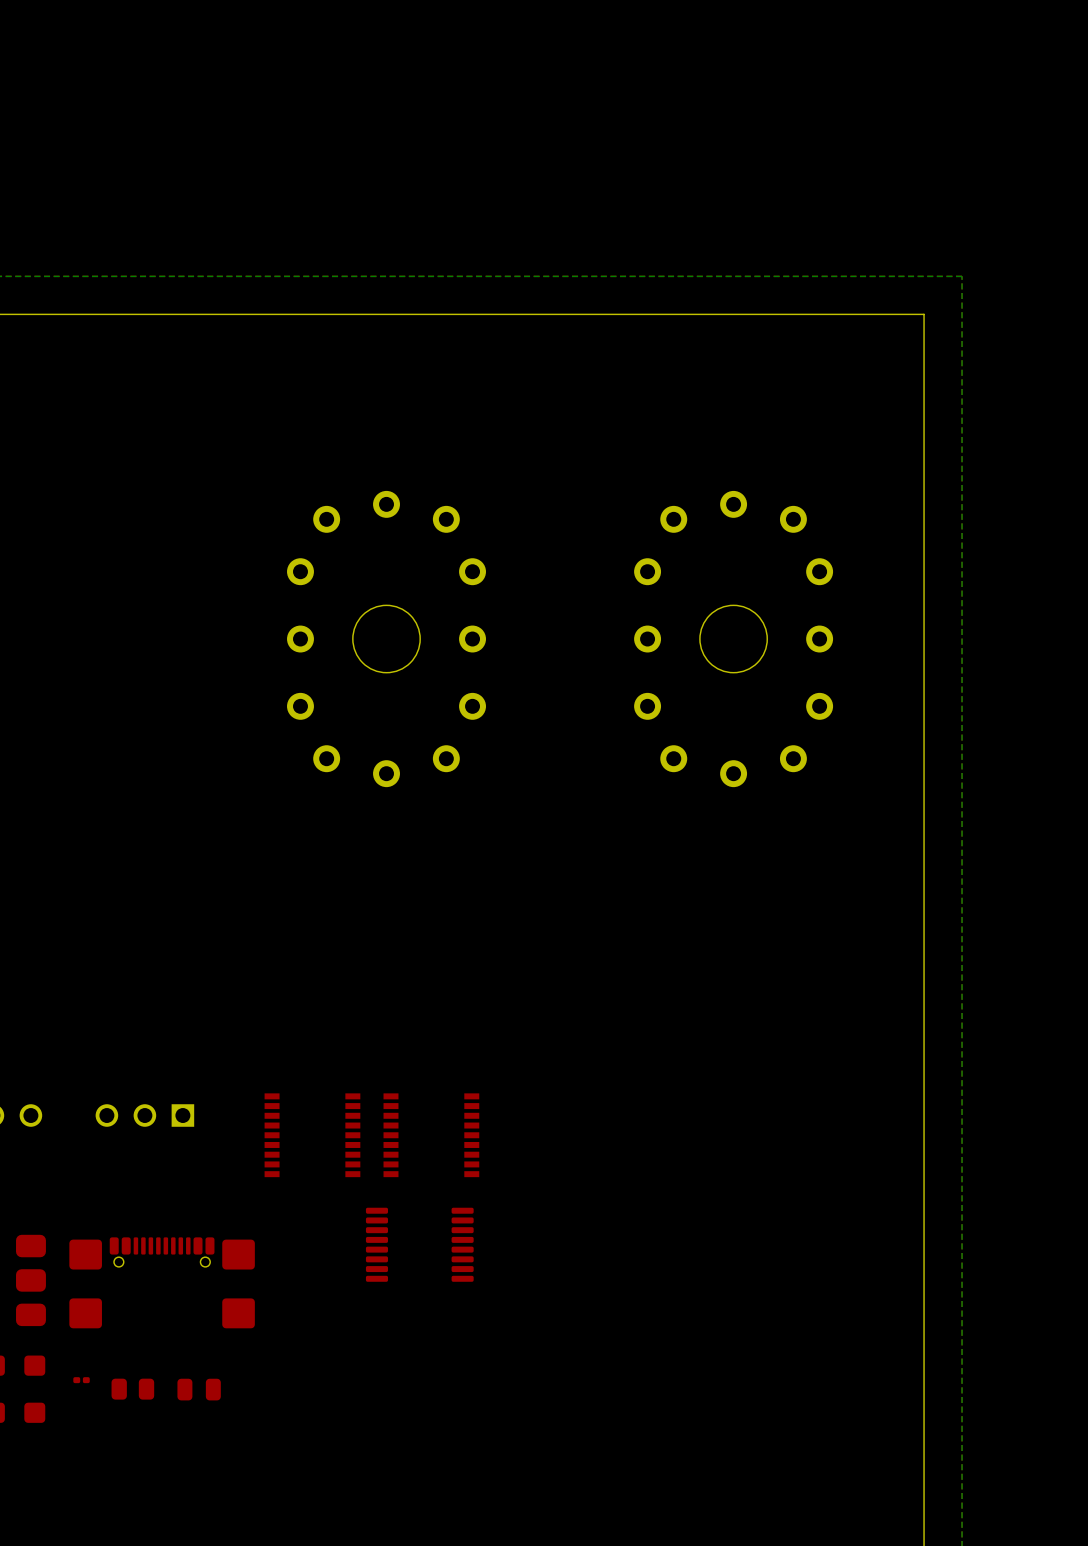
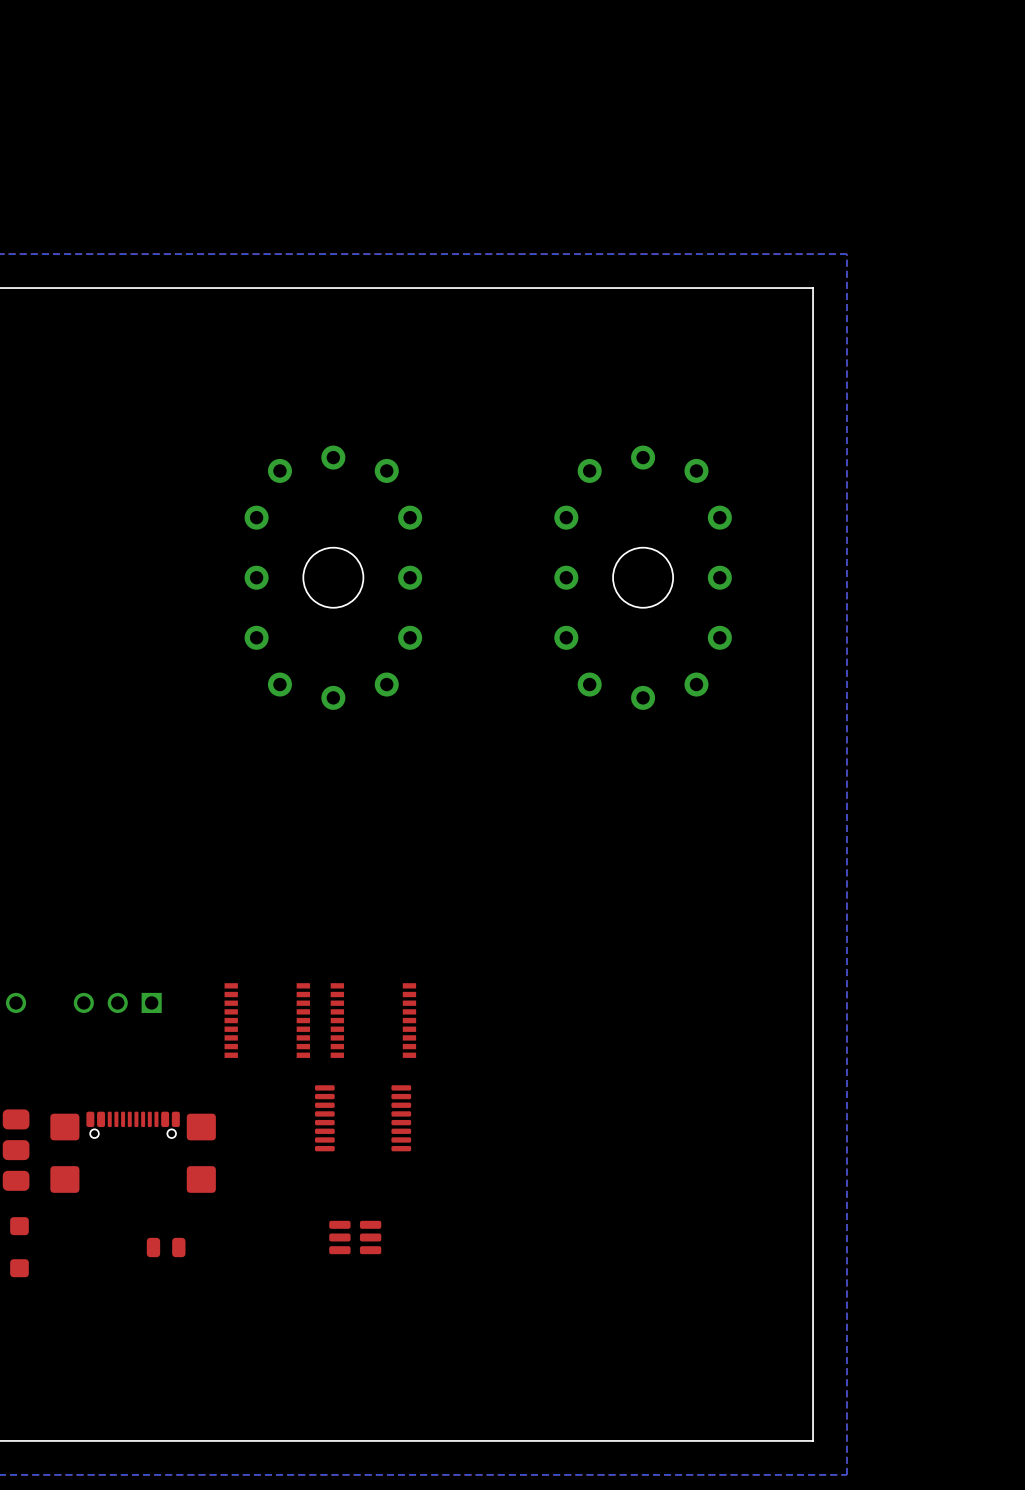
part: none -> (355, 1237)
part: (81, 1380) -> none
part: (132, 1389) -> none

